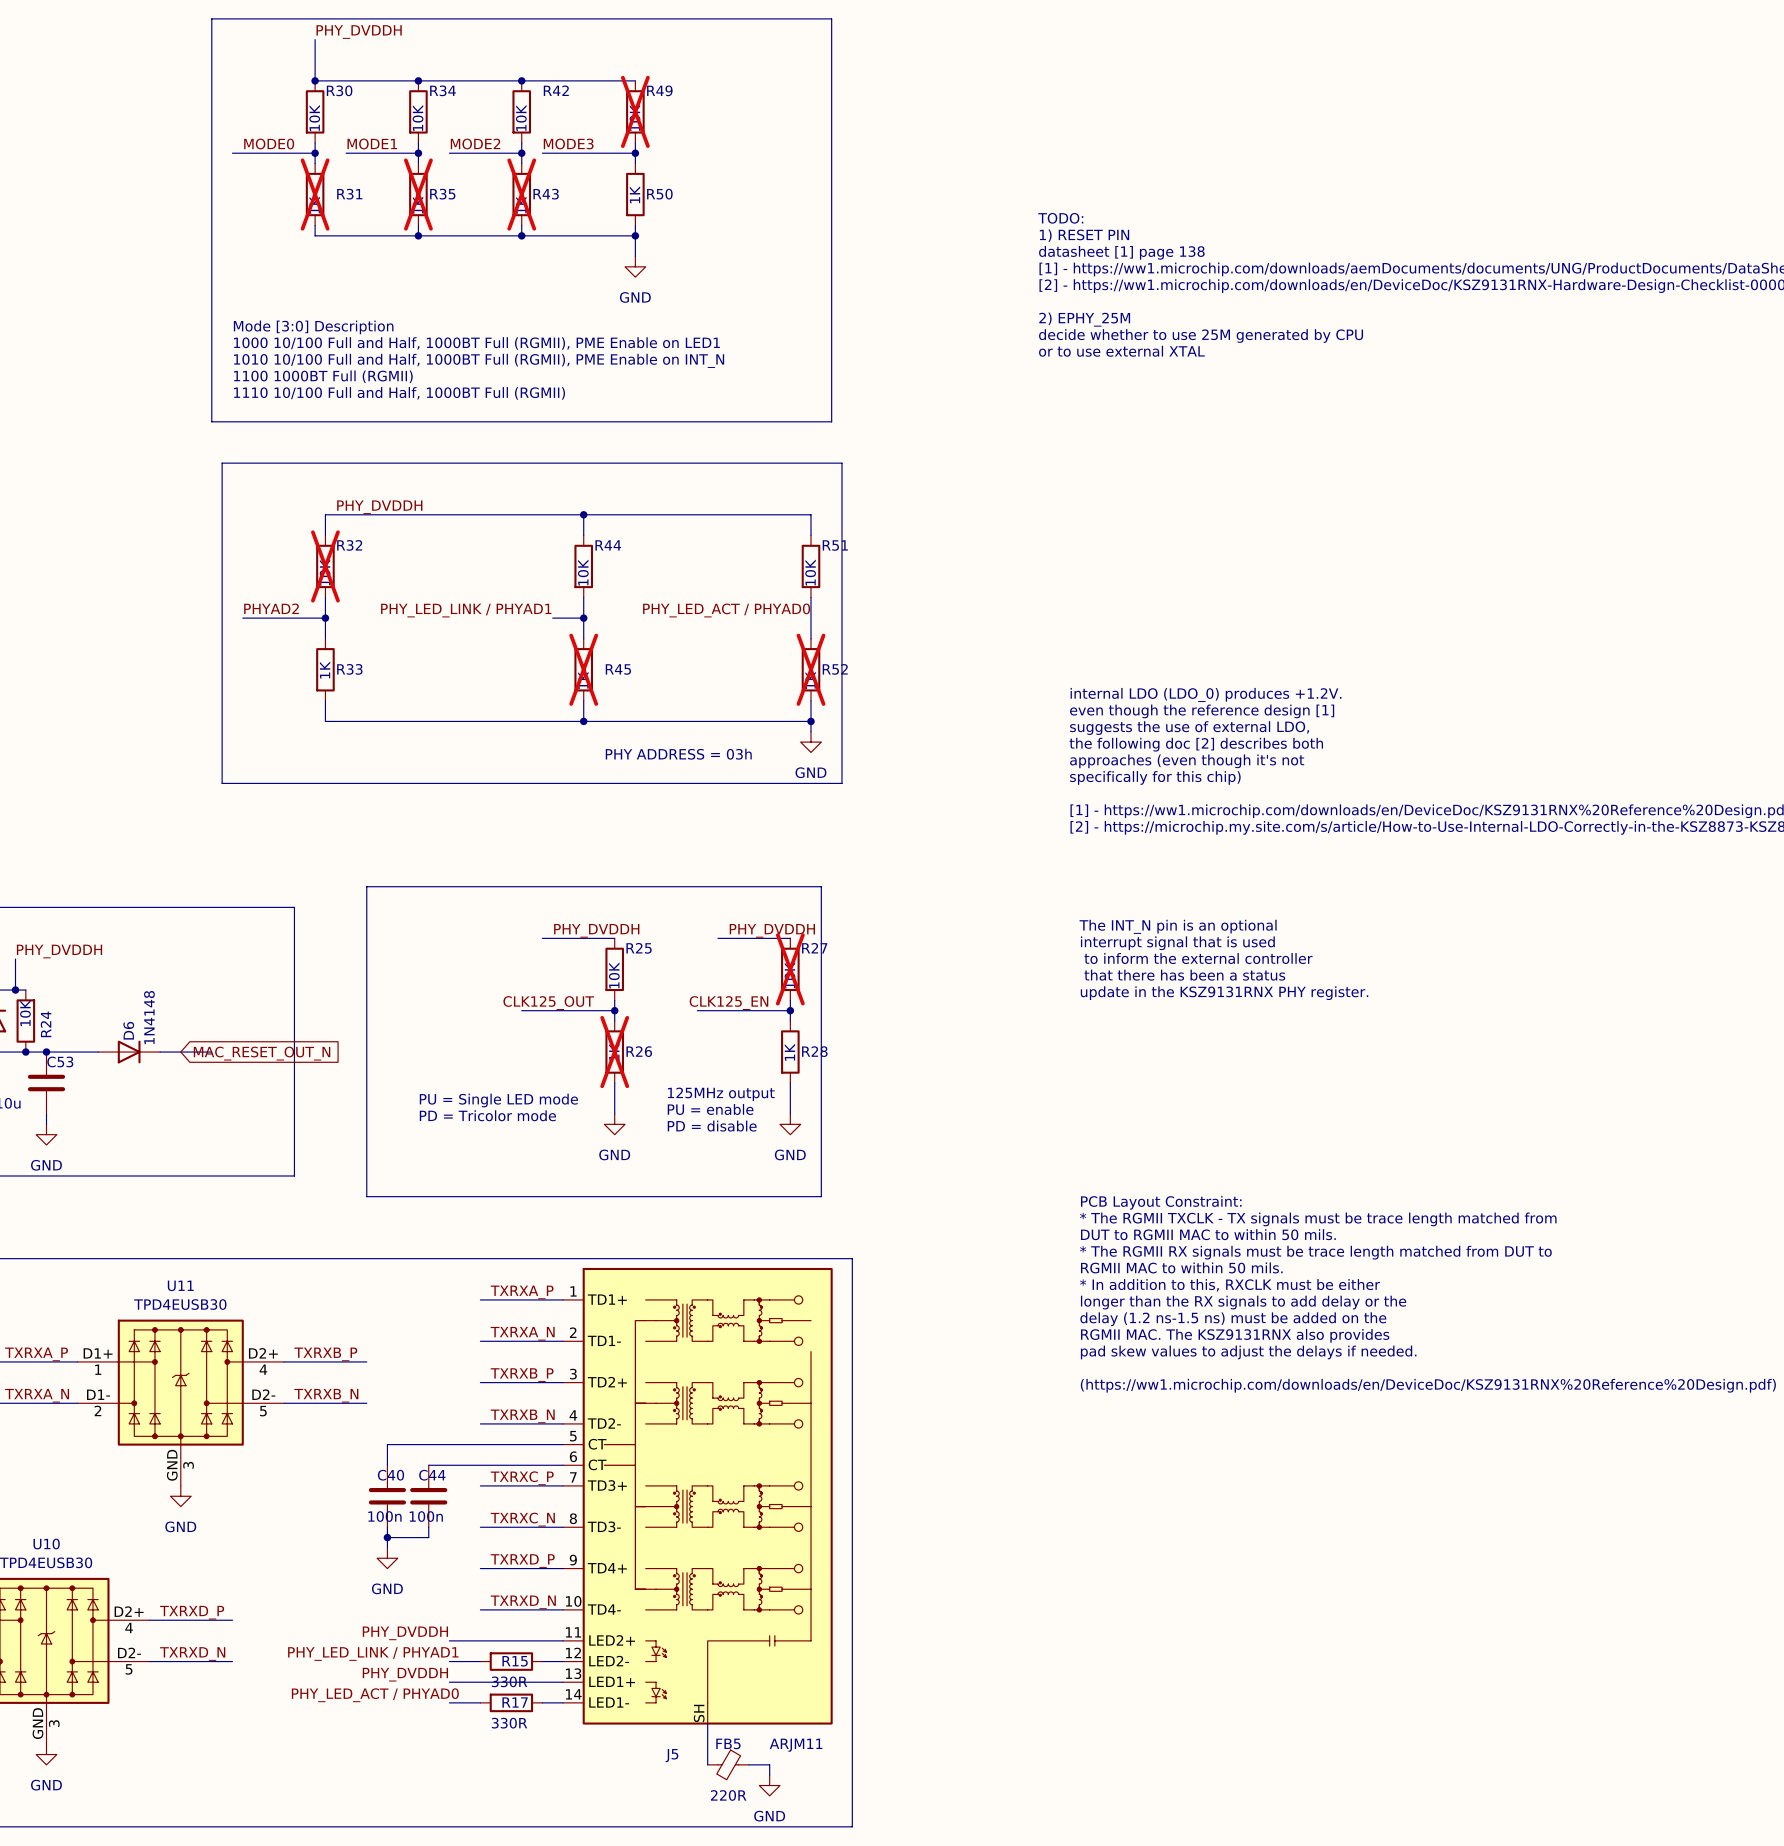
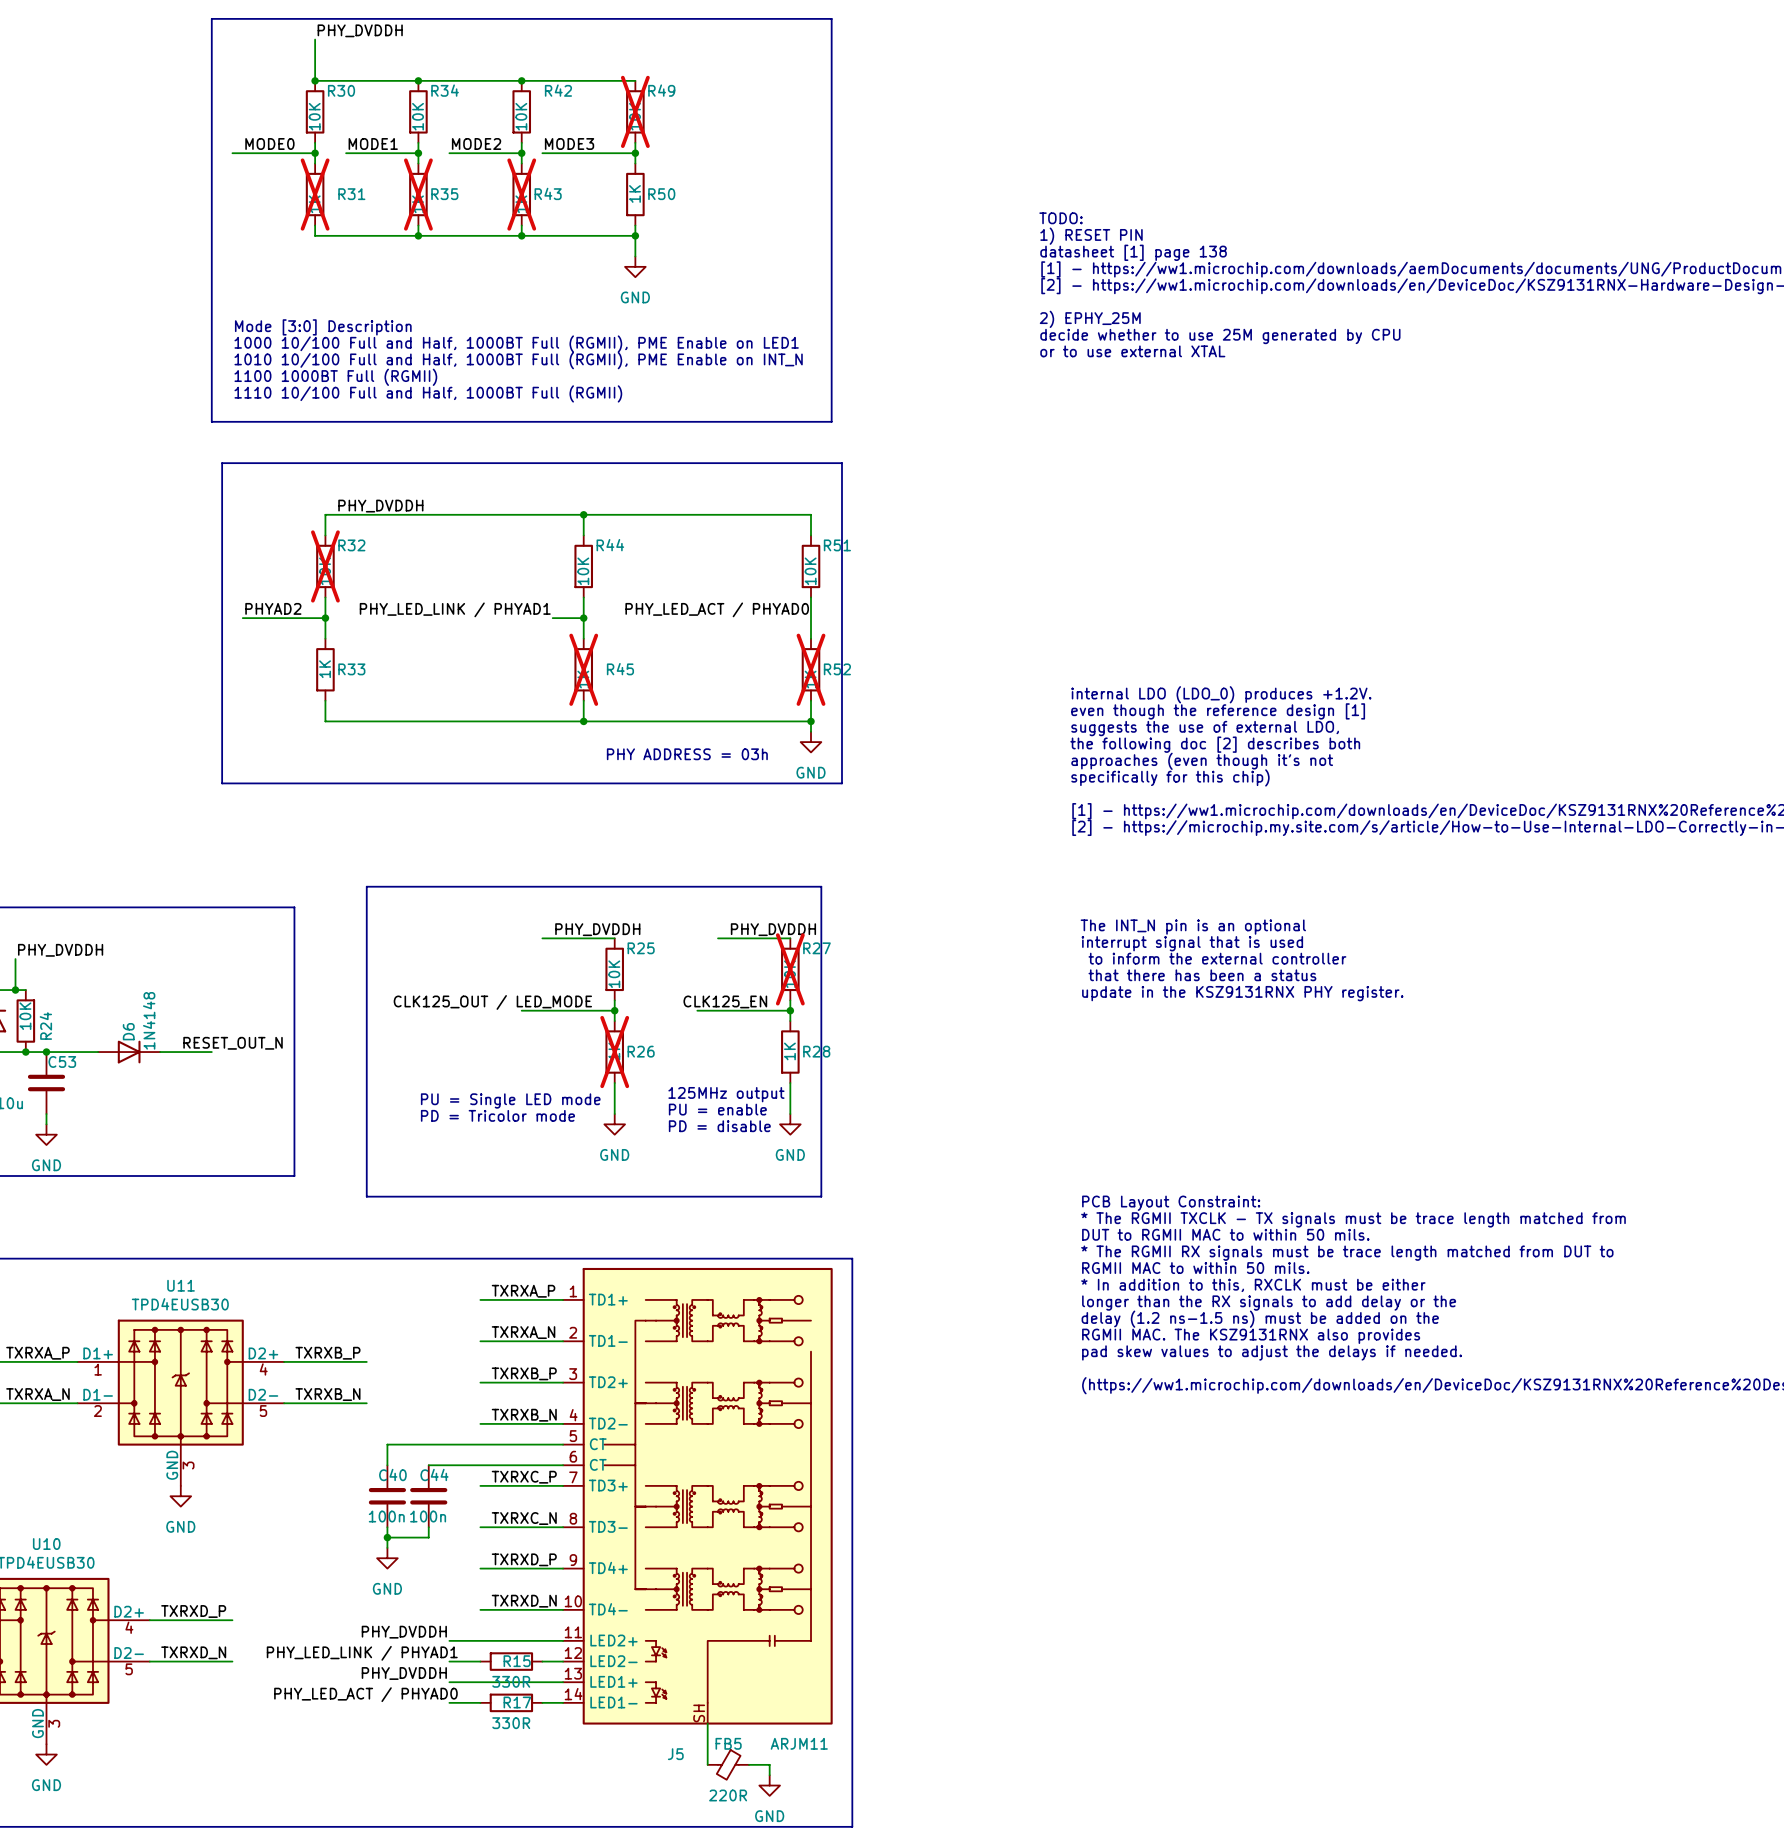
label: CLK125_OUT (548, 1003) -> CLK125_OUT / LED_MODE (492, 1002)
label: none -> RESET_OUT_N (233, 1043)
global label: MAC_RESET_OUT_N (262, 1053) -> none

